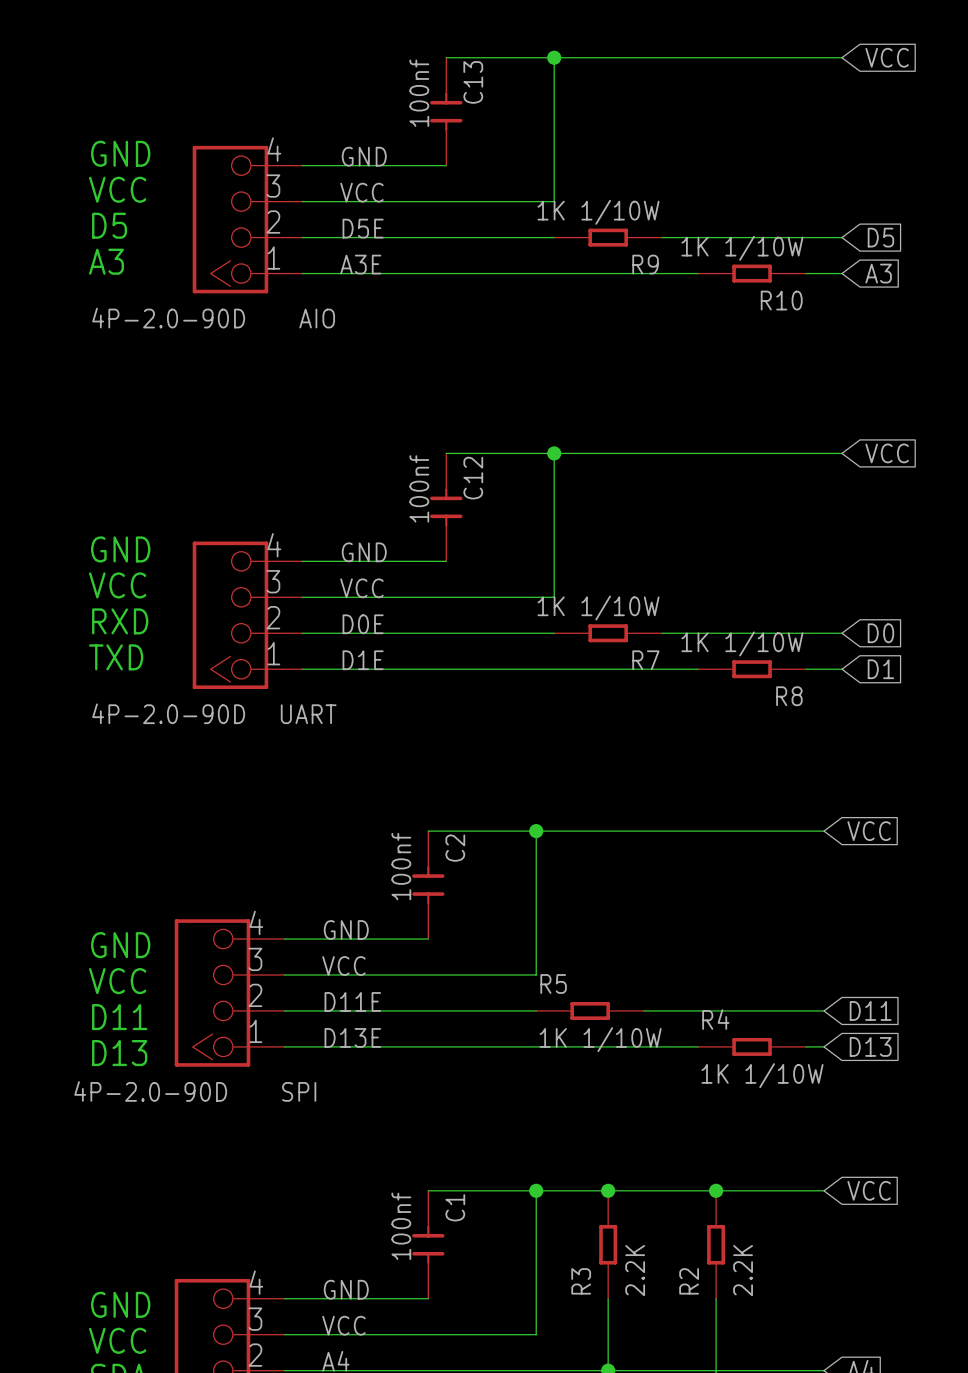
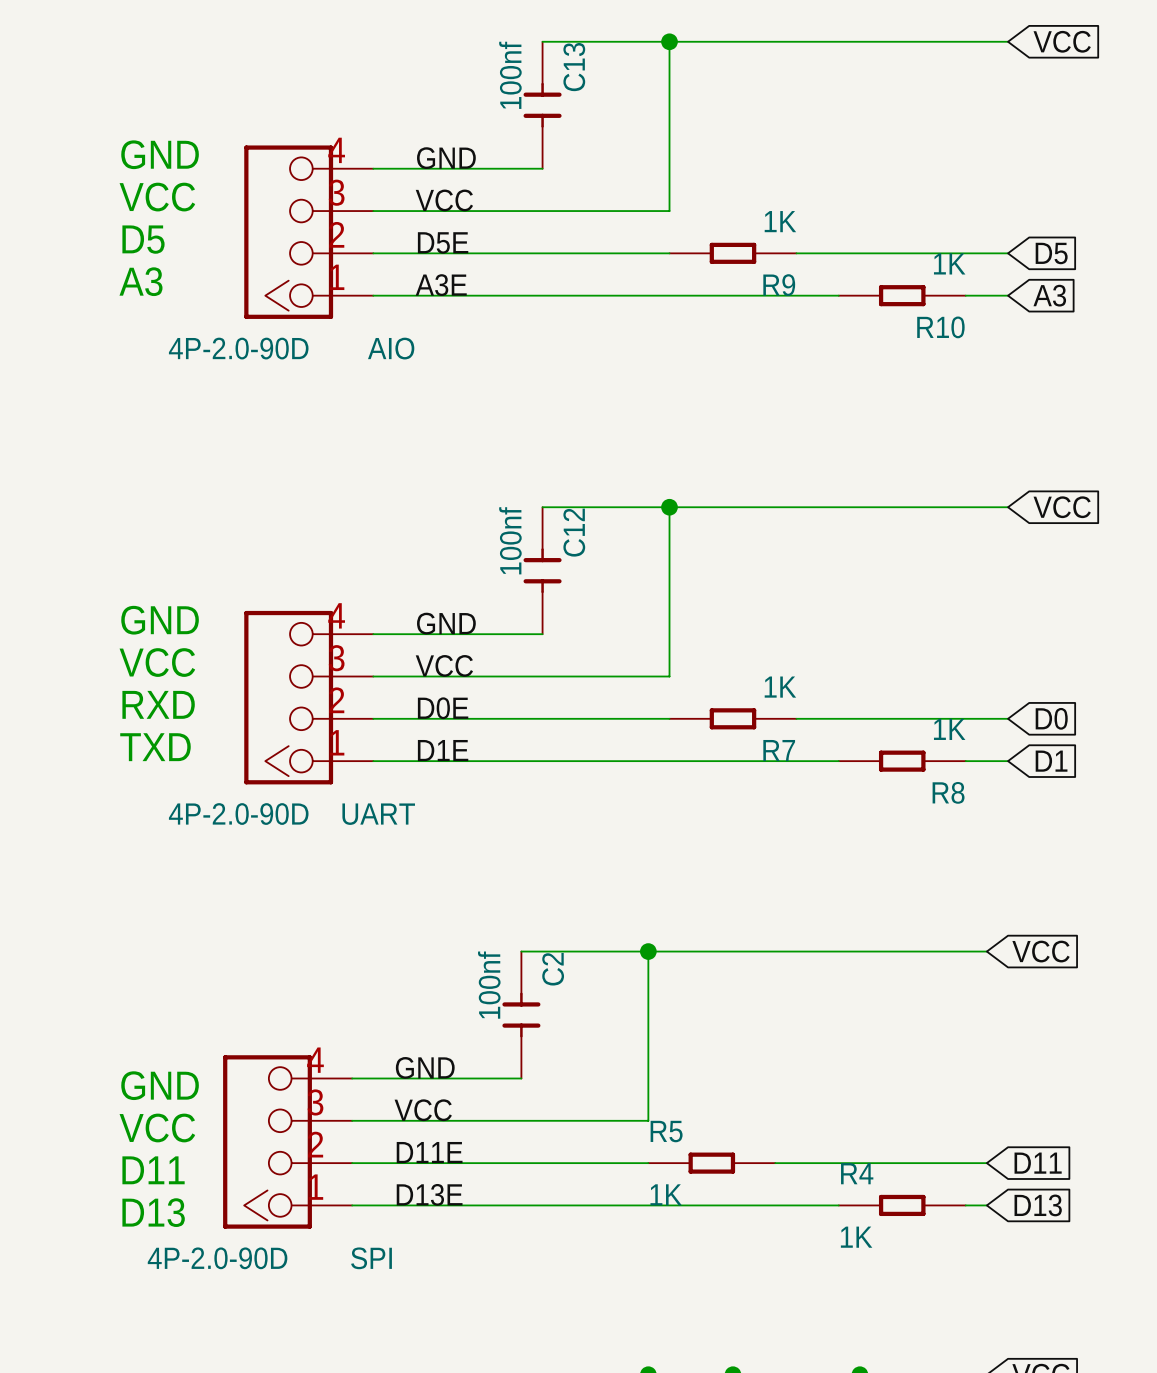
R9 value: 1K 1/10W (598, 212) -> 1K (780, 221)
R10 value: 1K 1/10W (742, 248) -> 1K (949, 263)
R7 value: 1K 1/10W (598, 608) -> 1K (780, 687)
R8 value: 1K 1/10W (742, 643) -> 1K (949, 729)
R5 value: 1K 1/10W (600, 1039) -> 1K (666, 1194)
R4 value: 1K 1/10W (762, 1075) -> 1K (856, 1237)

